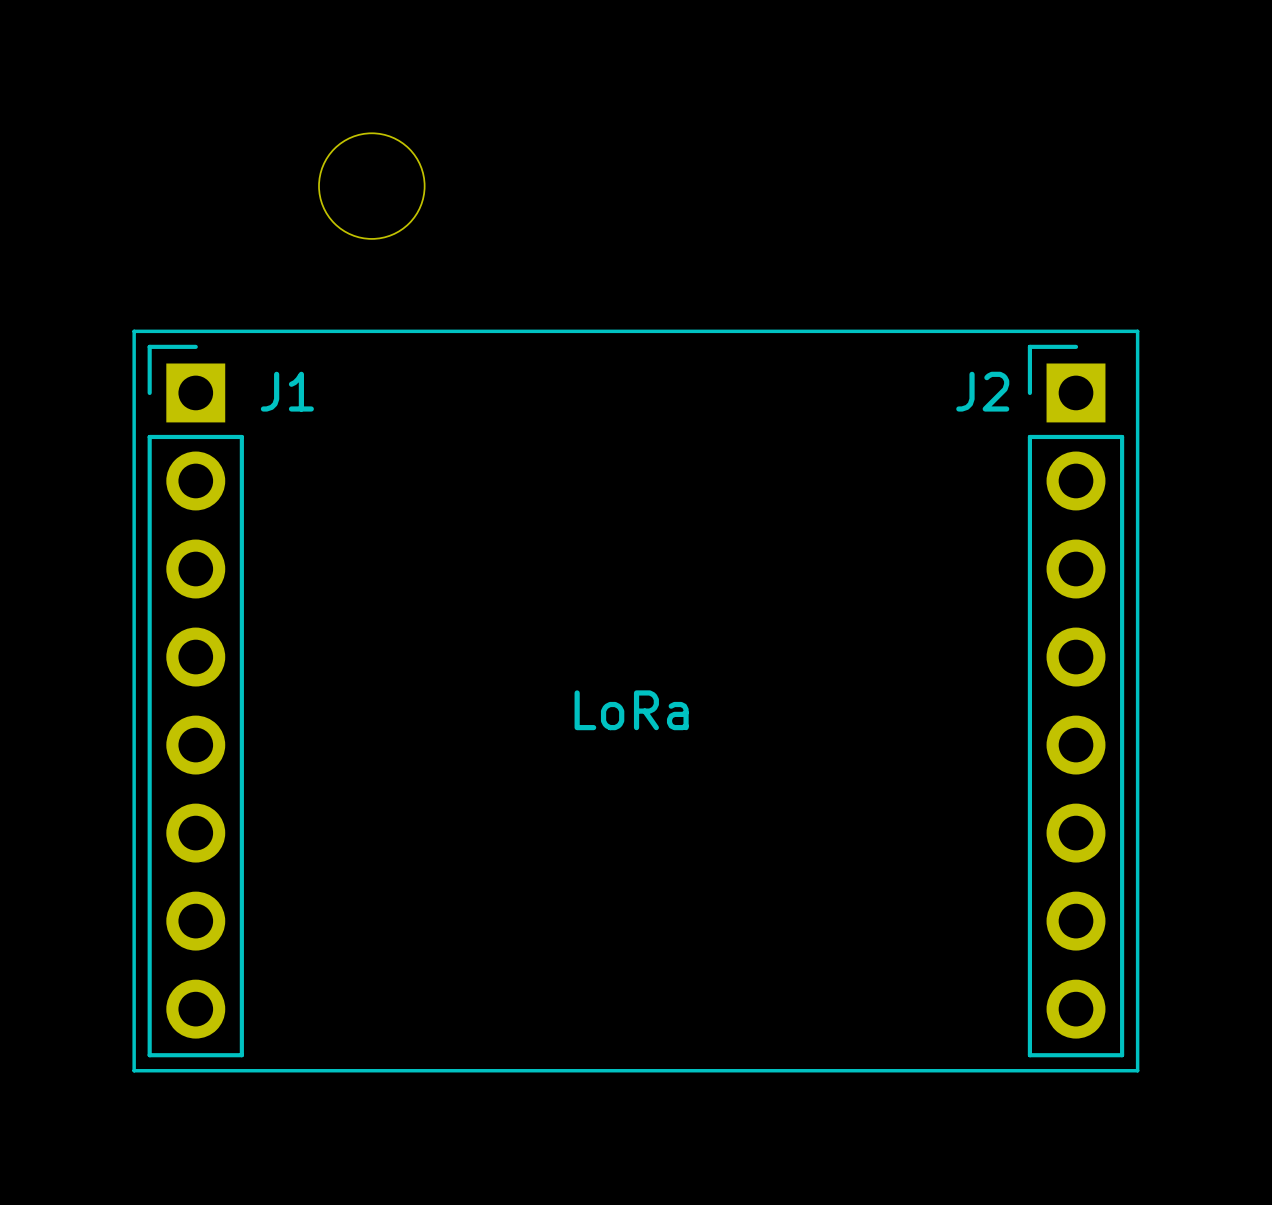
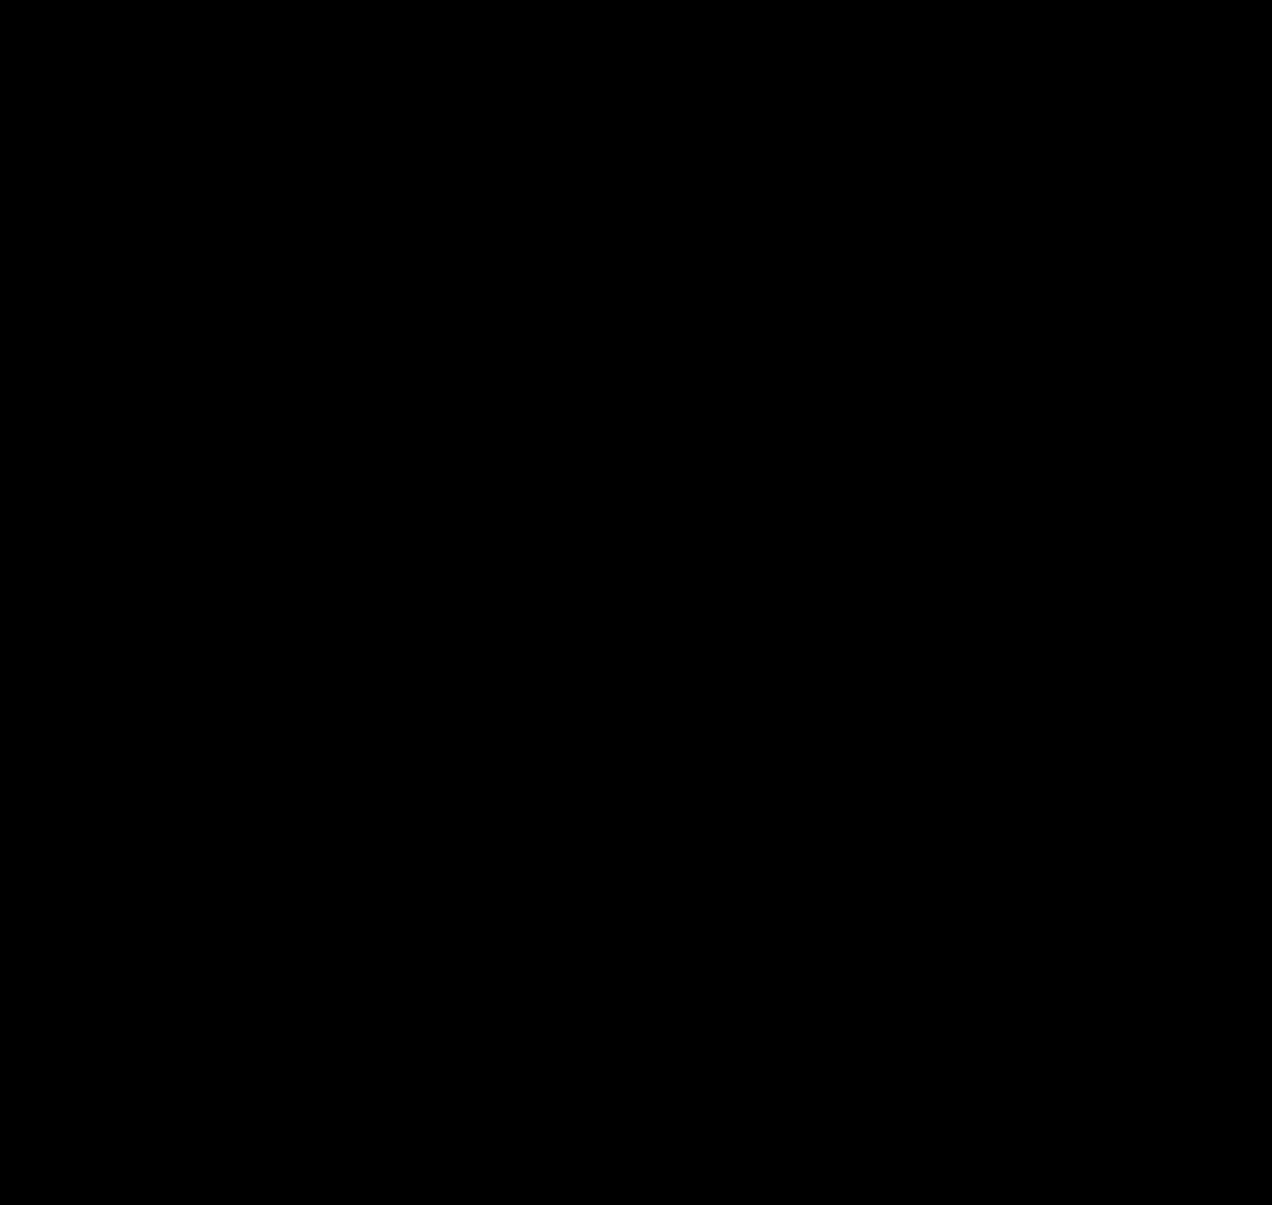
round board edge: [318, 132, 426, 240] -> none
line: (134, 331) (134, 1070) (1137, 1070) (1137, 331) (134, 331) -> none
J1: (195, 701) -> none
J2: (1076, 701) -> none
text: LoRa (631, 710) -> none

